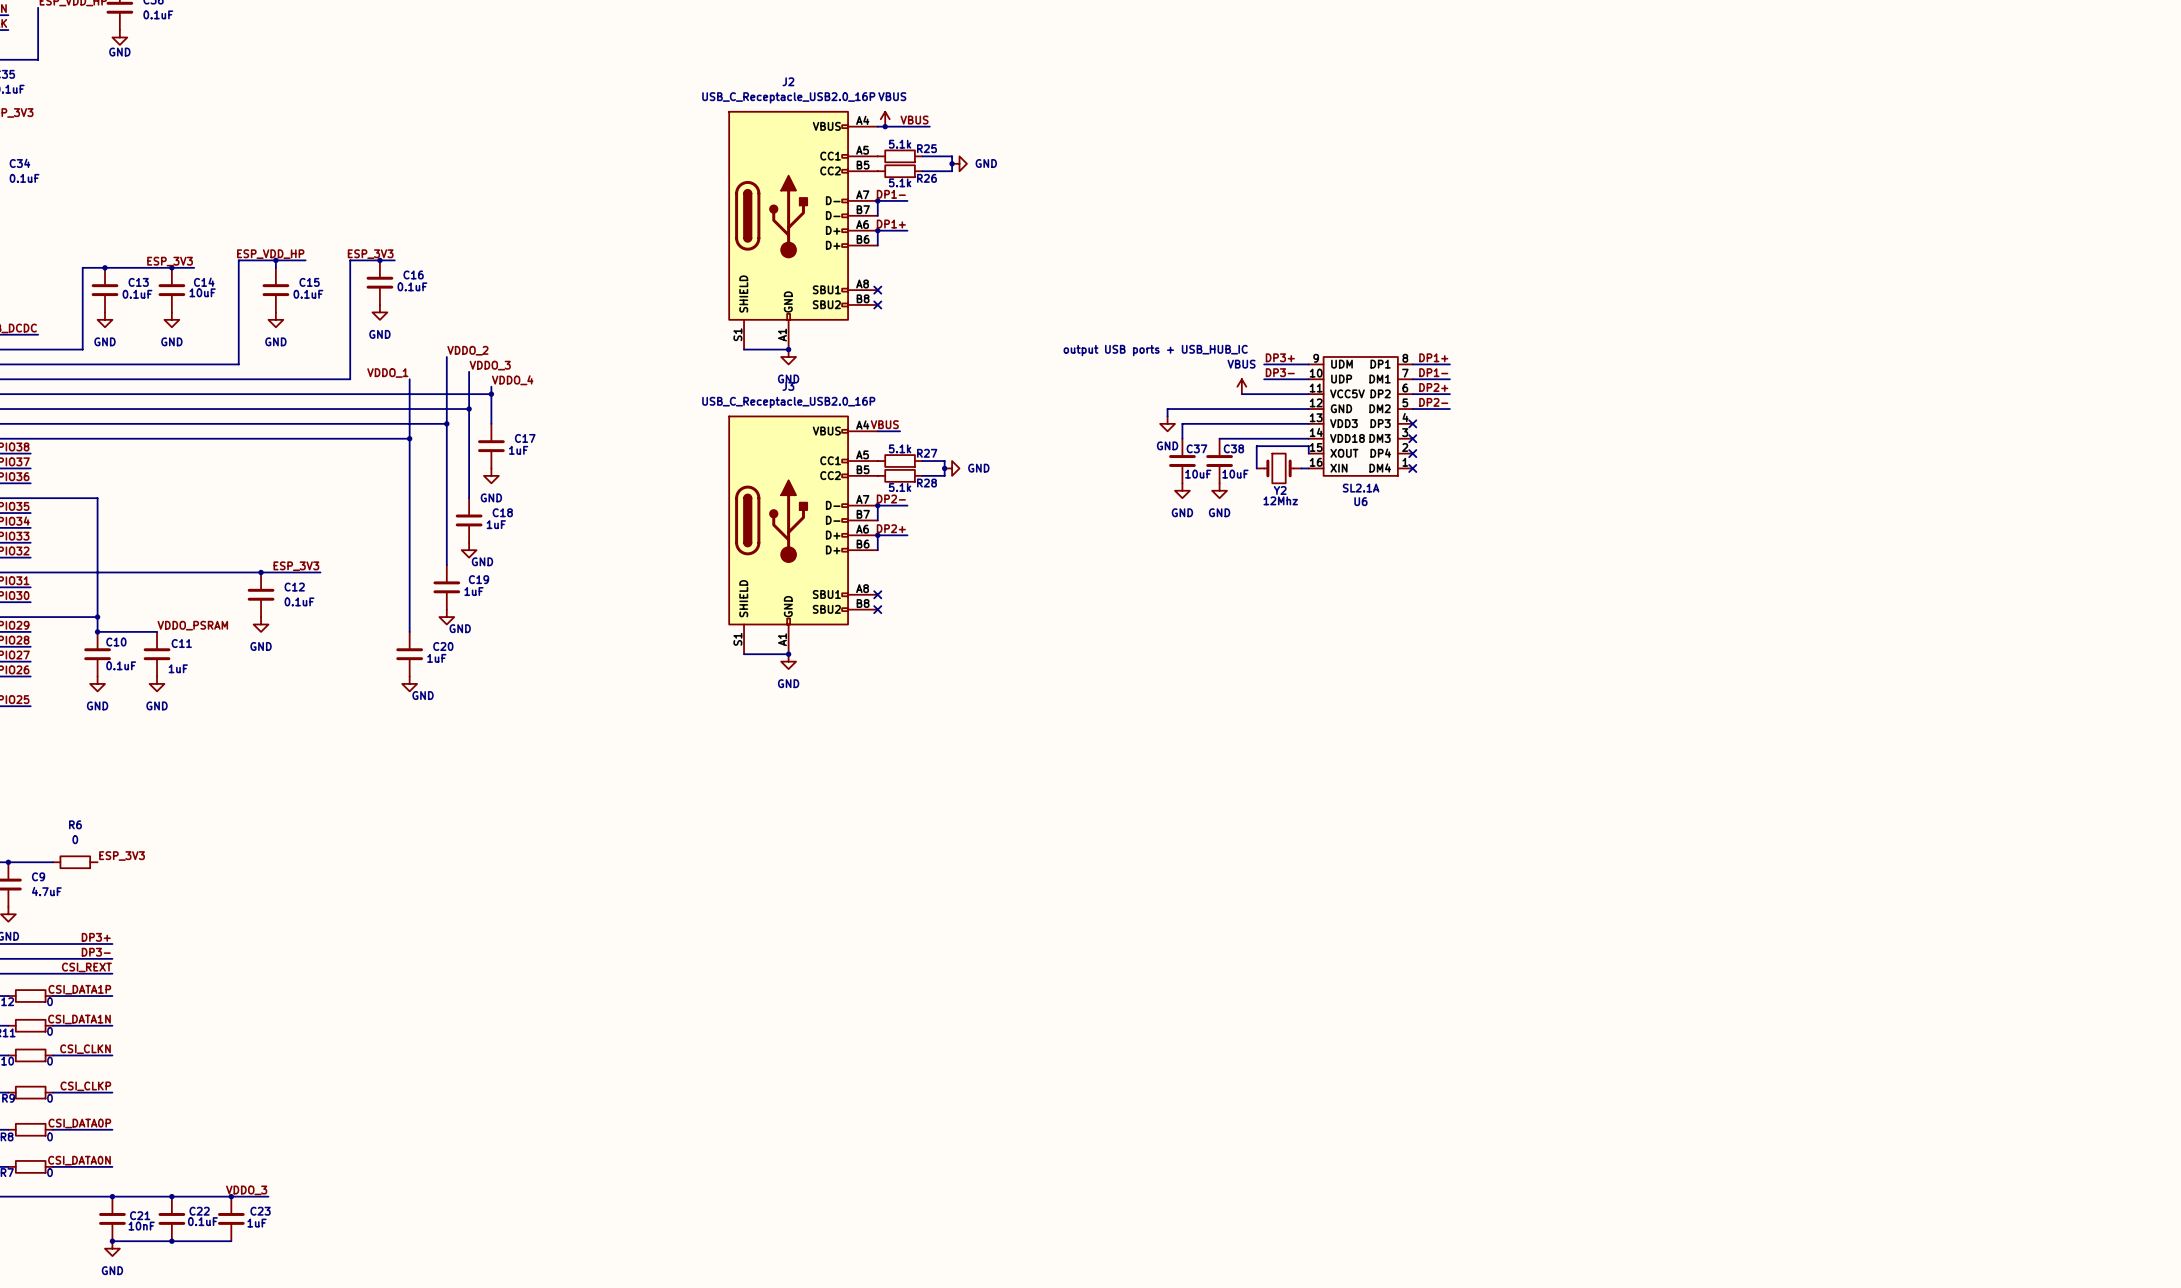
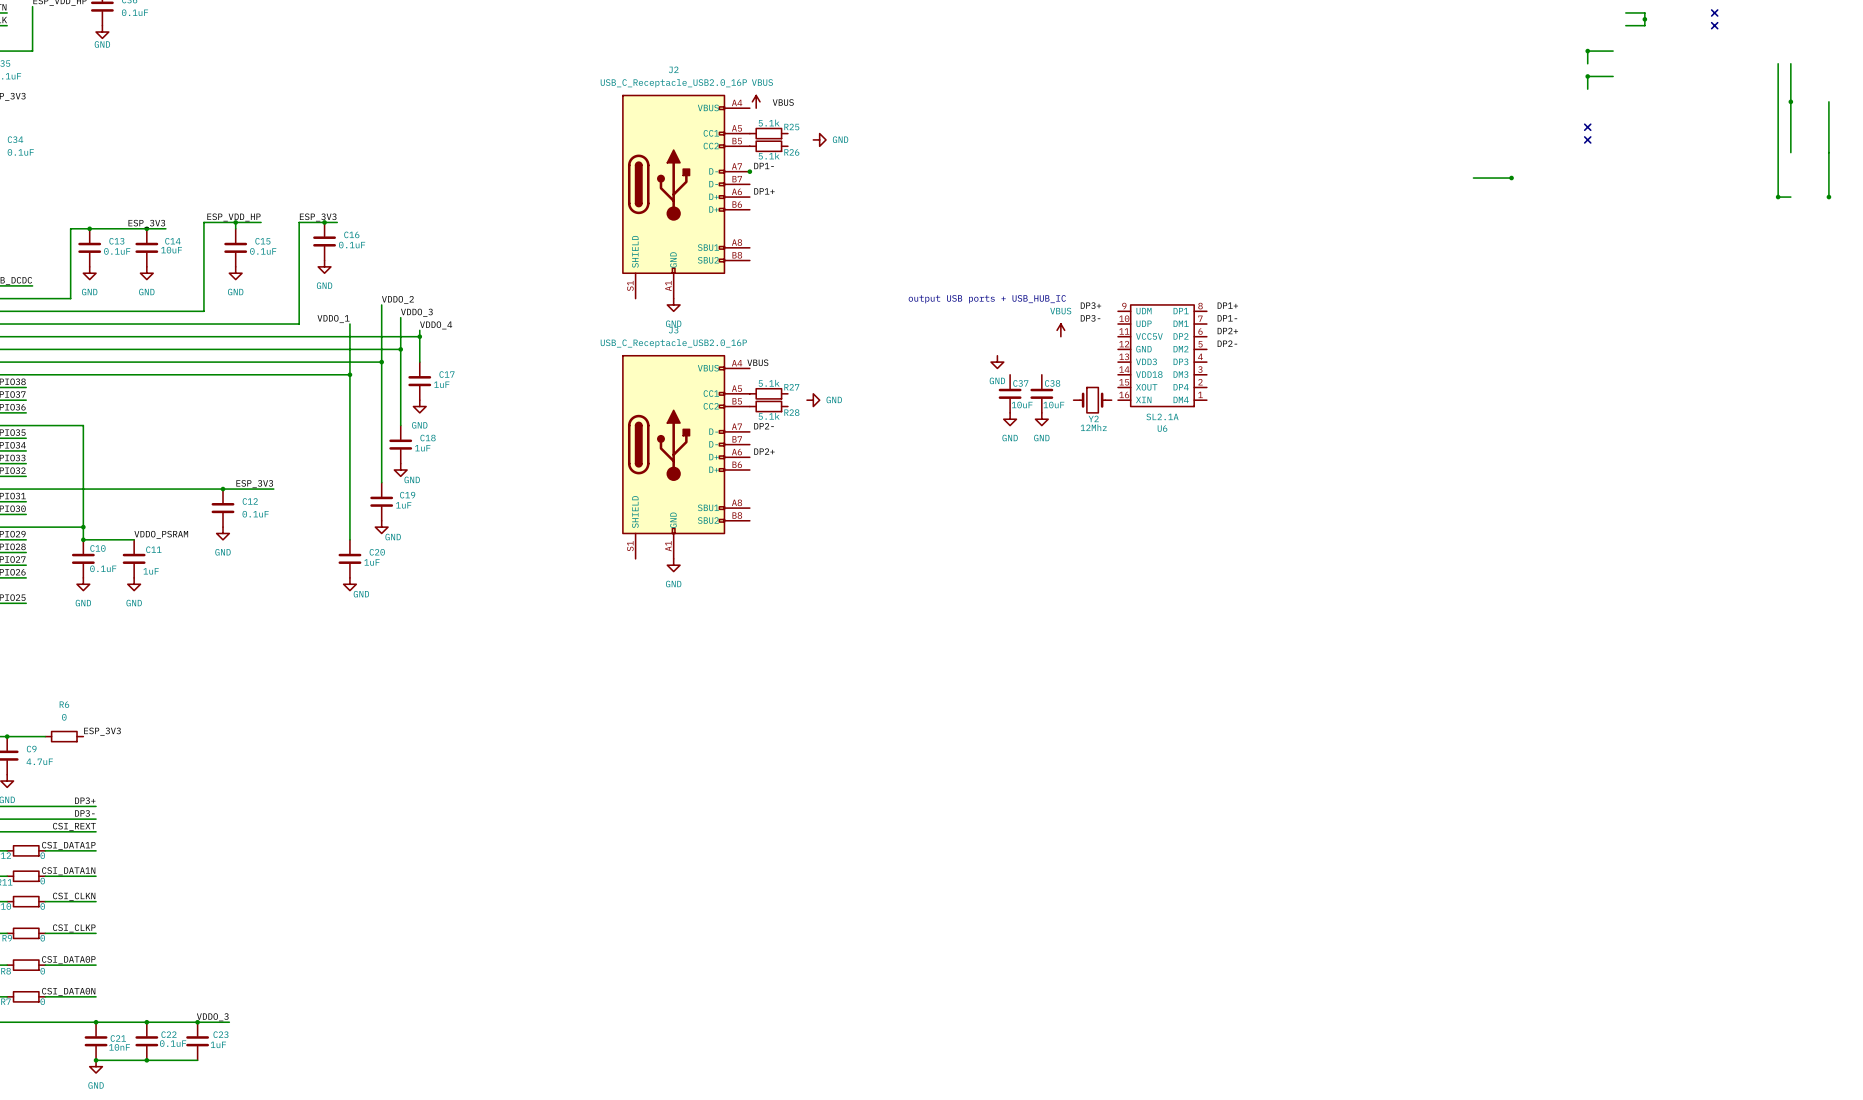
wire: none -> (1625, 12) (1644, 12) (1644, 25) (1625, 25)
no-connect mark: none -> (1714, 12)
junction: none -> (1644, 19)
no-connect mark: none -> (1714, 25)
junction: none -> (1587, 51)
wire: none -> (1613, 51) (1587, 51) (1587, 63)
wire: none -> (1778, 63) (1778, 197) (1790, 197)
wire: none -> (1790, 63) (1790, 152)
junction: none -> (1587, 76)
wire: none -> (1613, 76) (1587, 76) (1587, 89)
junction: none -> (1790, 101)
wire: none -> (1828, 101) (1828, 197)
wire: (877, 126) (929, 126) -> none
junction: (885, 126) -> none
no-connect mark: none -> (1587, 127)
wire: (922, 156) (952, 156) (952, 171) (922, 171) -> none
junction: (952, 163) -> none
no-connect mark: none -> (1587, 139)
wire: (907, 200) (877, 200) (877, 215) -> none
wire: none -> (1473, 178) (1511, 178)
junction: none -> (1511, 178)
junction: (877, 230) -> none
wire: (907, 230) (877, 230) (877, 245) -> none
junction: none -> (1778, 197)
junction: none -> (1828, 197)
no-connect mark: (877, 290) -> none
no-connect mark: (877, 304) -> none
wire: (744, 349) (788, 349) -> none
junction: (788, 349) -> none
wire: (1264, 364) (1308, 364) -> none
wire: (1412, 364) (1449, 364) -> none
wire: (1264, 379) (1308, 379) -> none
wire: (1412, 379) (1449, 379) -> none
wire: (1241, 394) (1308, 394) -> none
wire: (1412, 394) (1449, 394) -> none
wire: (1308, 409) (1167, 409) (1167, 416) -> none
wire: (1412, 409) (1449, 409) -> none
wire: (1308, 423) (1182, 423) (1182, 438) -> none
no-connect mark: (1412, 423) -> none
wire: (877, 431) (900, 431) -> none
wire: (1219, 438) (1308, 438) -> none
no-connect mark: (1412, 438) -> none
wire: (1308, 453) (1308, 446) (1256, 446) (1256, 468) -> none
no-connect mark: (1412, 453) -> none
wire: (922, 461) (944, 461) (944, 475) (922, 475) -> none
junction: (944, 468) -> none
wire: (1301, 468) (1308, 468) -> none
no-connect mark: (1412, 468) -> none
junction: (877, 505) -> none
wire: (907, 505) (877, 505) (877, 520) -> none
junction: (877, 535) -> none
wire: (907, 535) (877, 535) (877, 550) -> none
no-connect mark: (877, 594) -> none
no-connect mark: (877, 609) -> none
wire: (744, 654) (788, 654) -> none
junction: (788, 654) -> none

